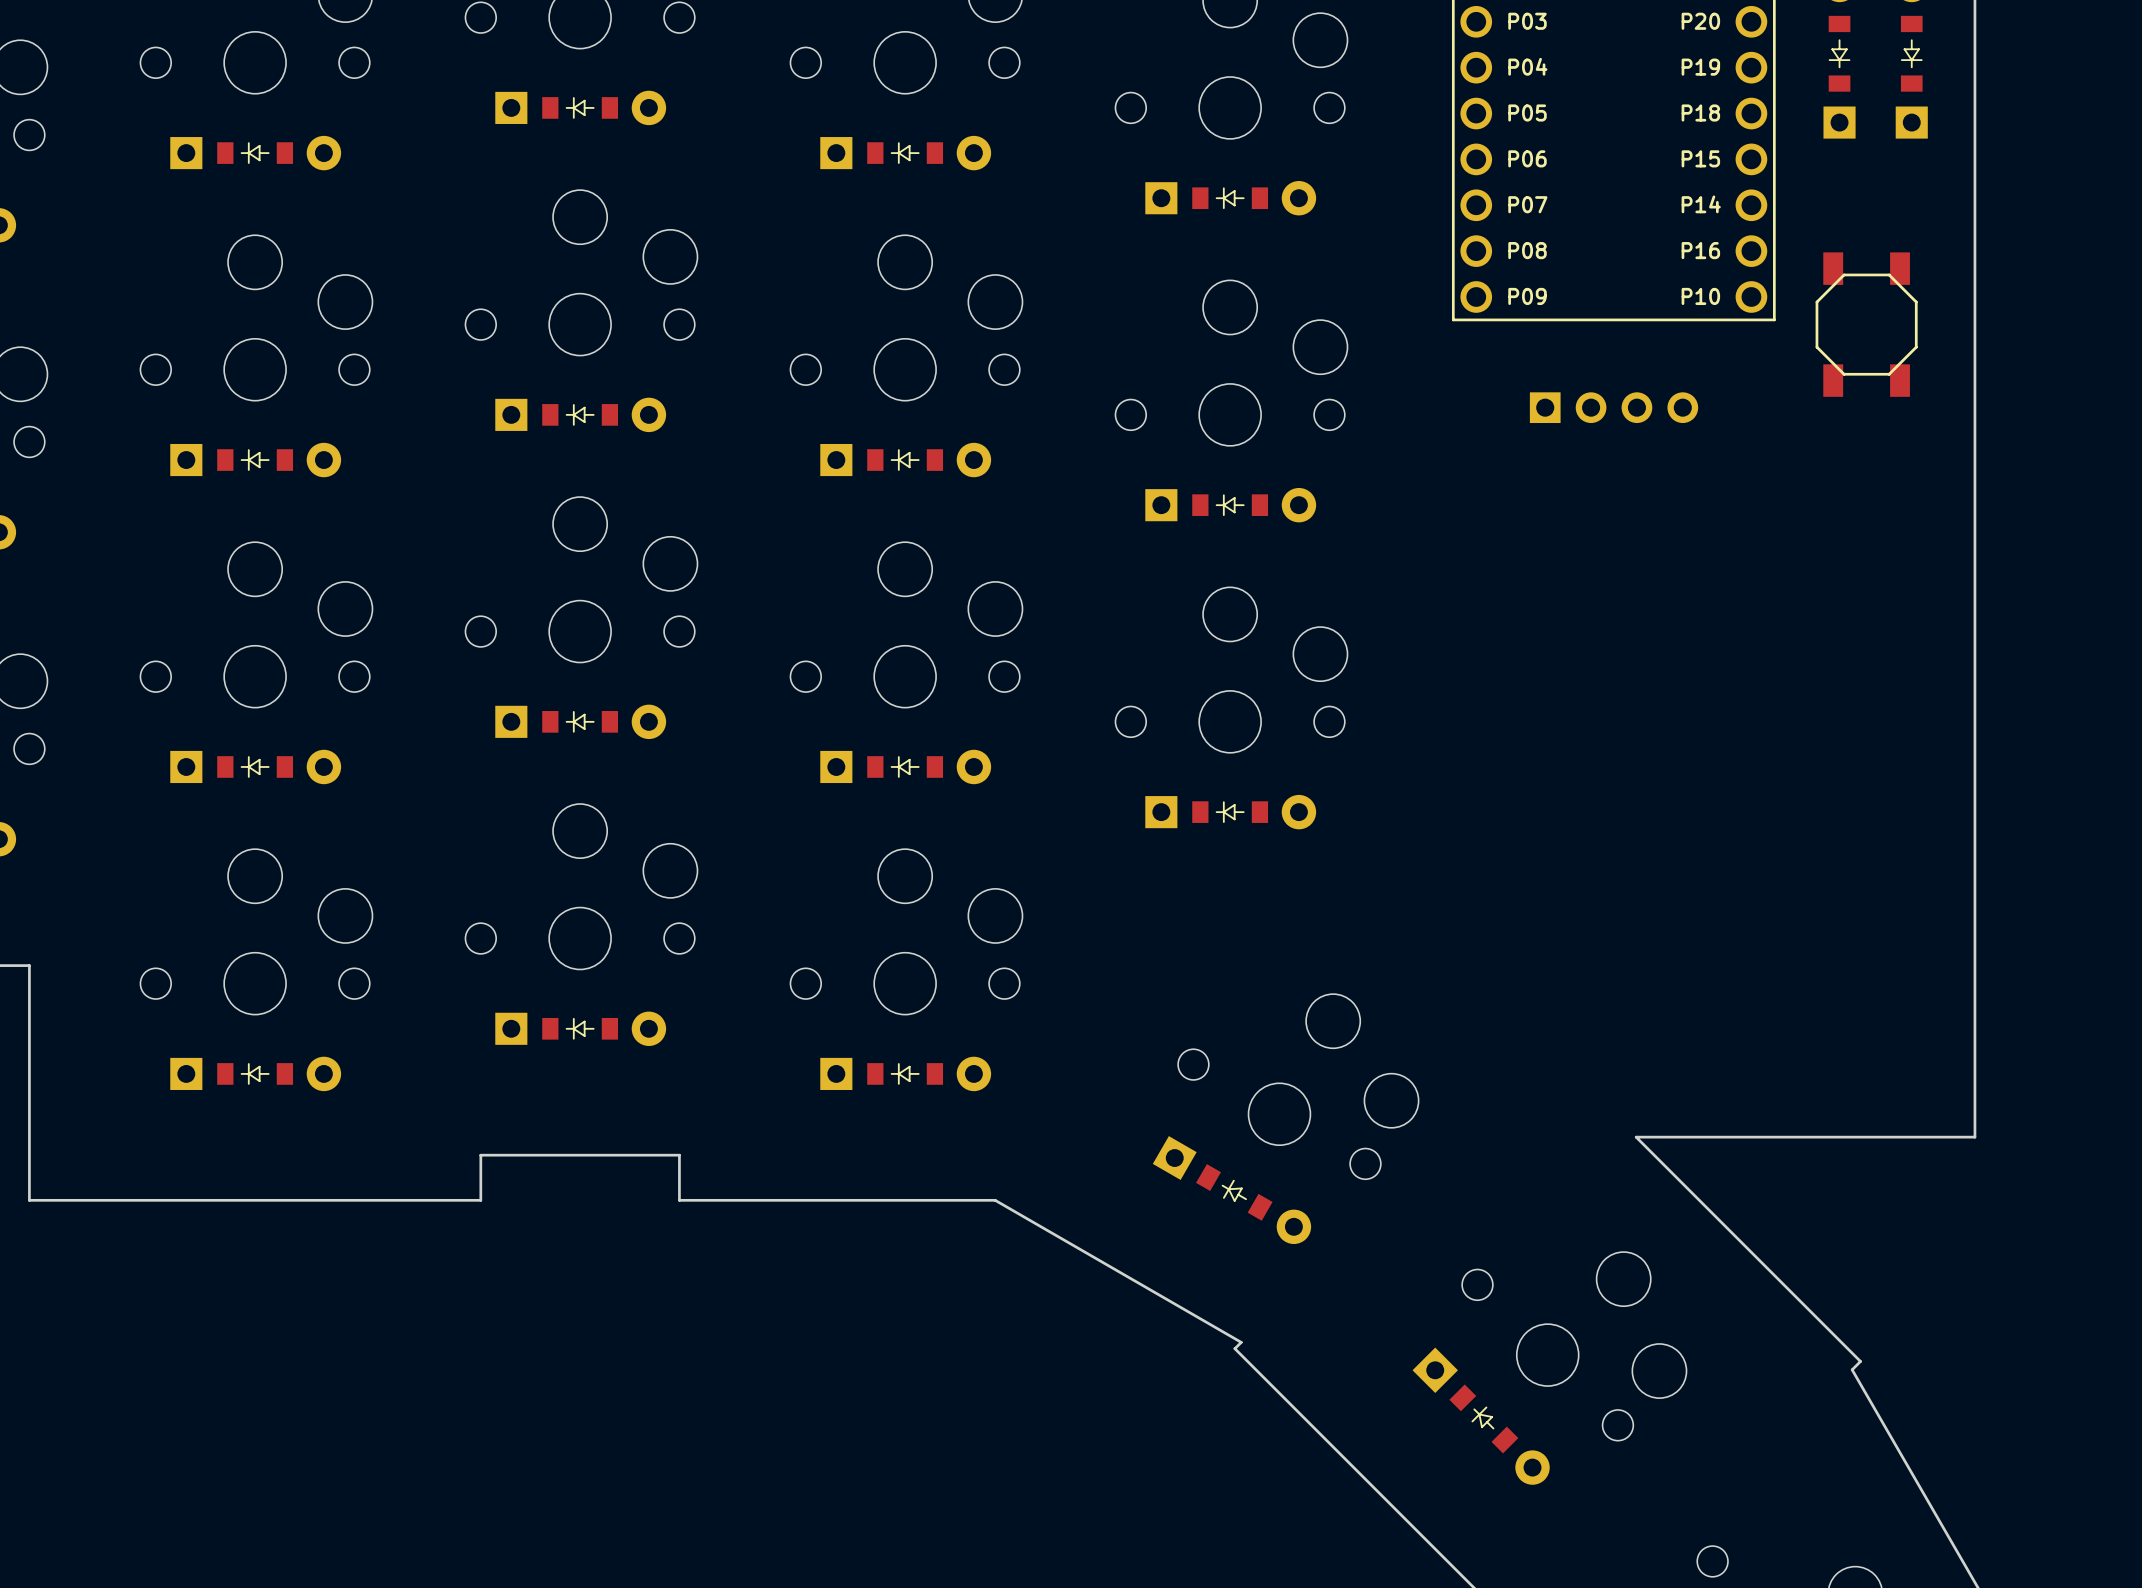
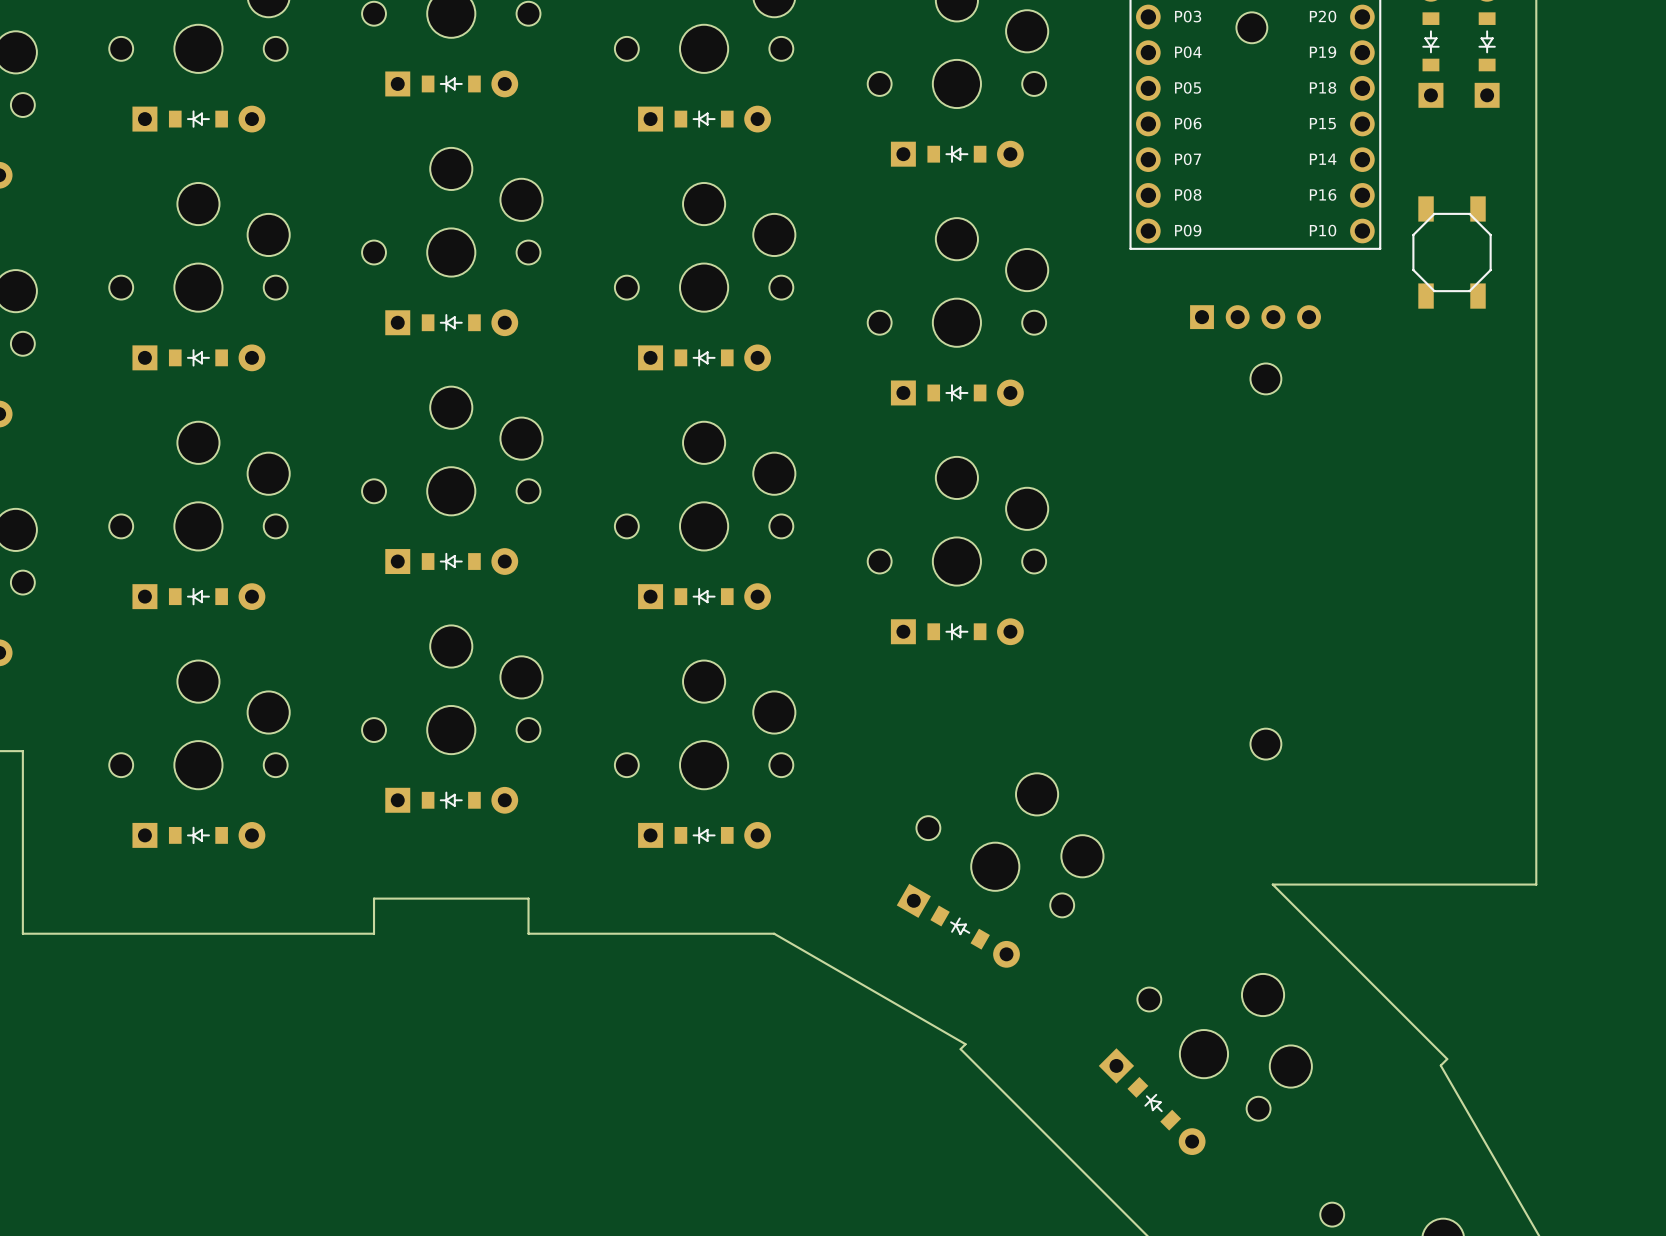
part: none -> (1251, 27)
part: none -> (1265, 378)
part: none -> (1265, 744)

